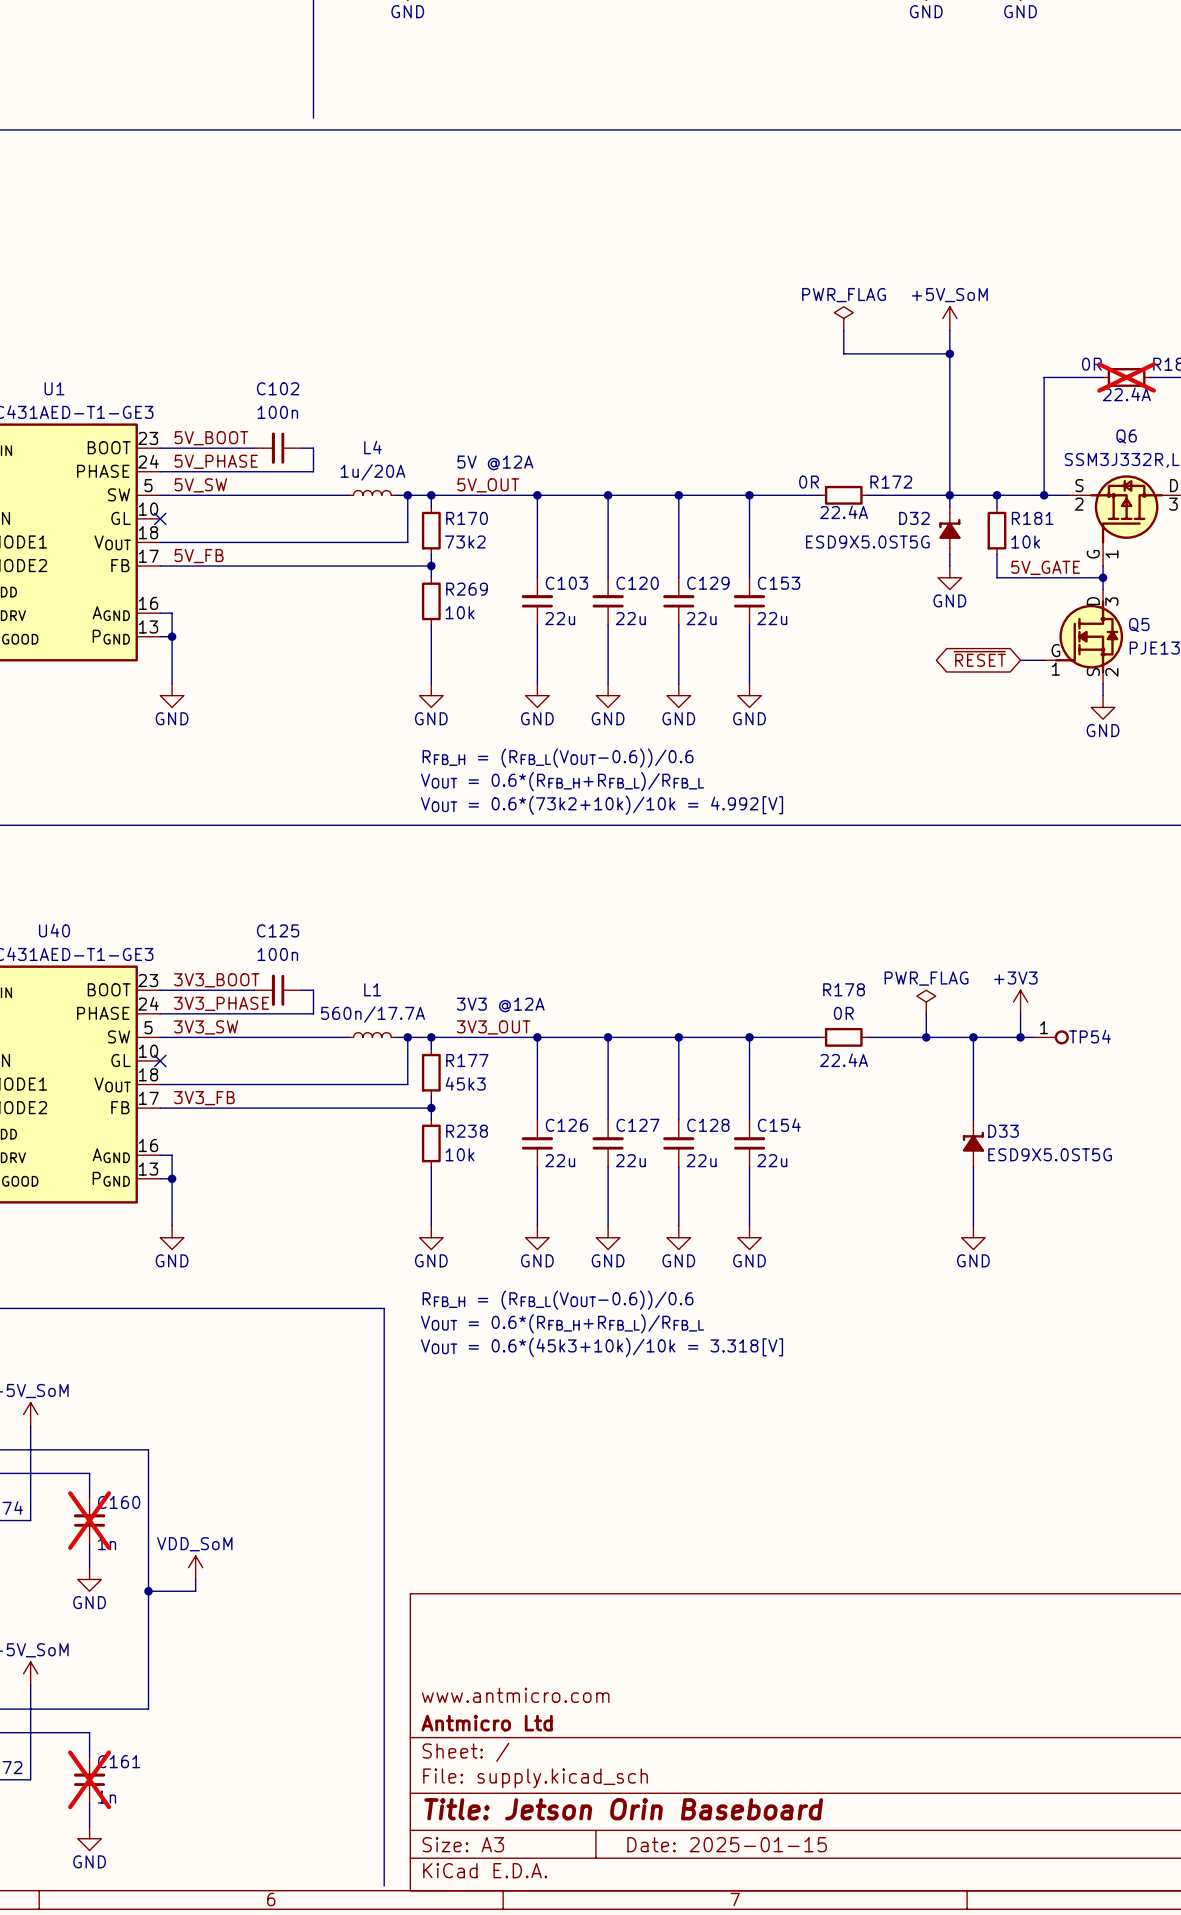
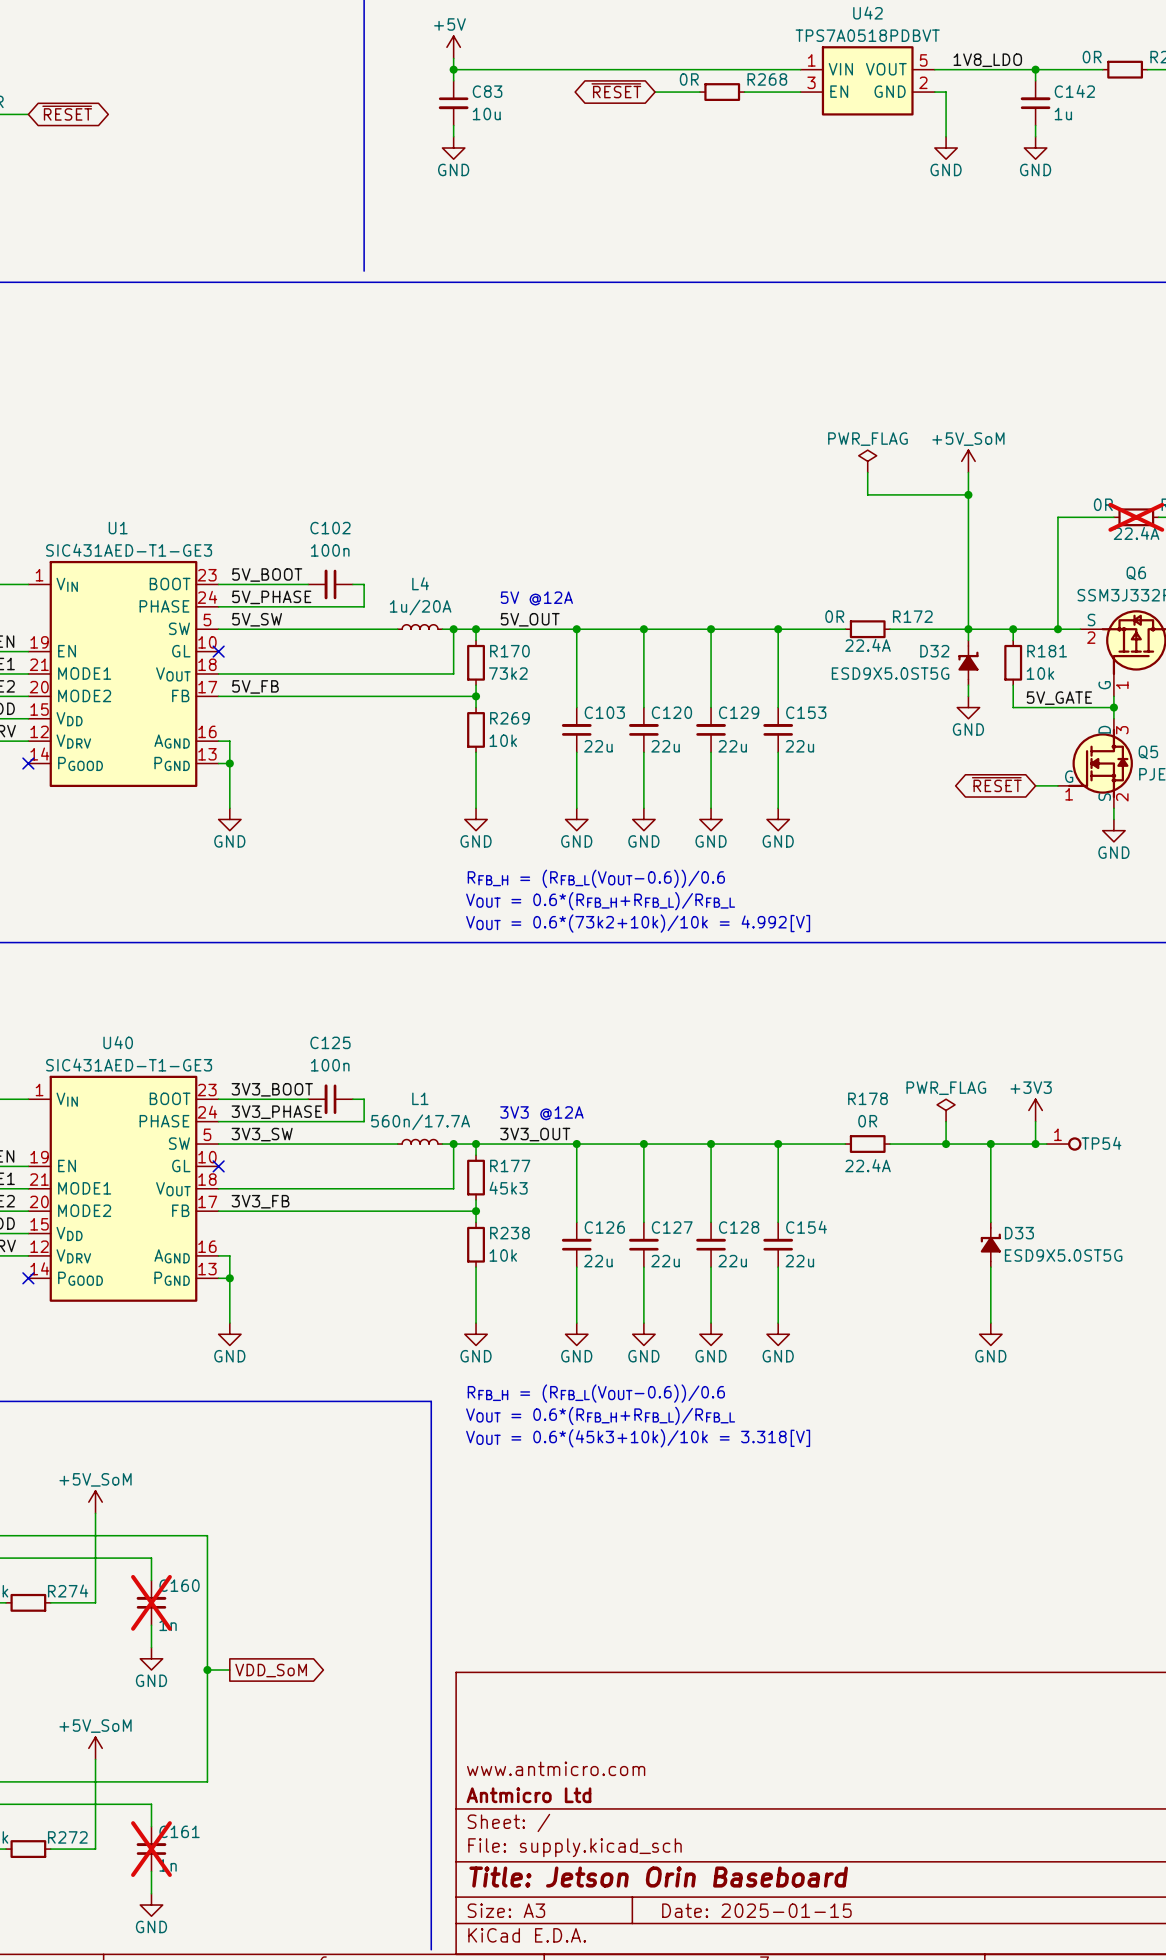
power symbol: VDD_SoM (195, 1567) -> none
wire: (195, 1579) (195, 1591) (172, 1591) -> none
global label: none -> VDD_SoM (271, 1670)

